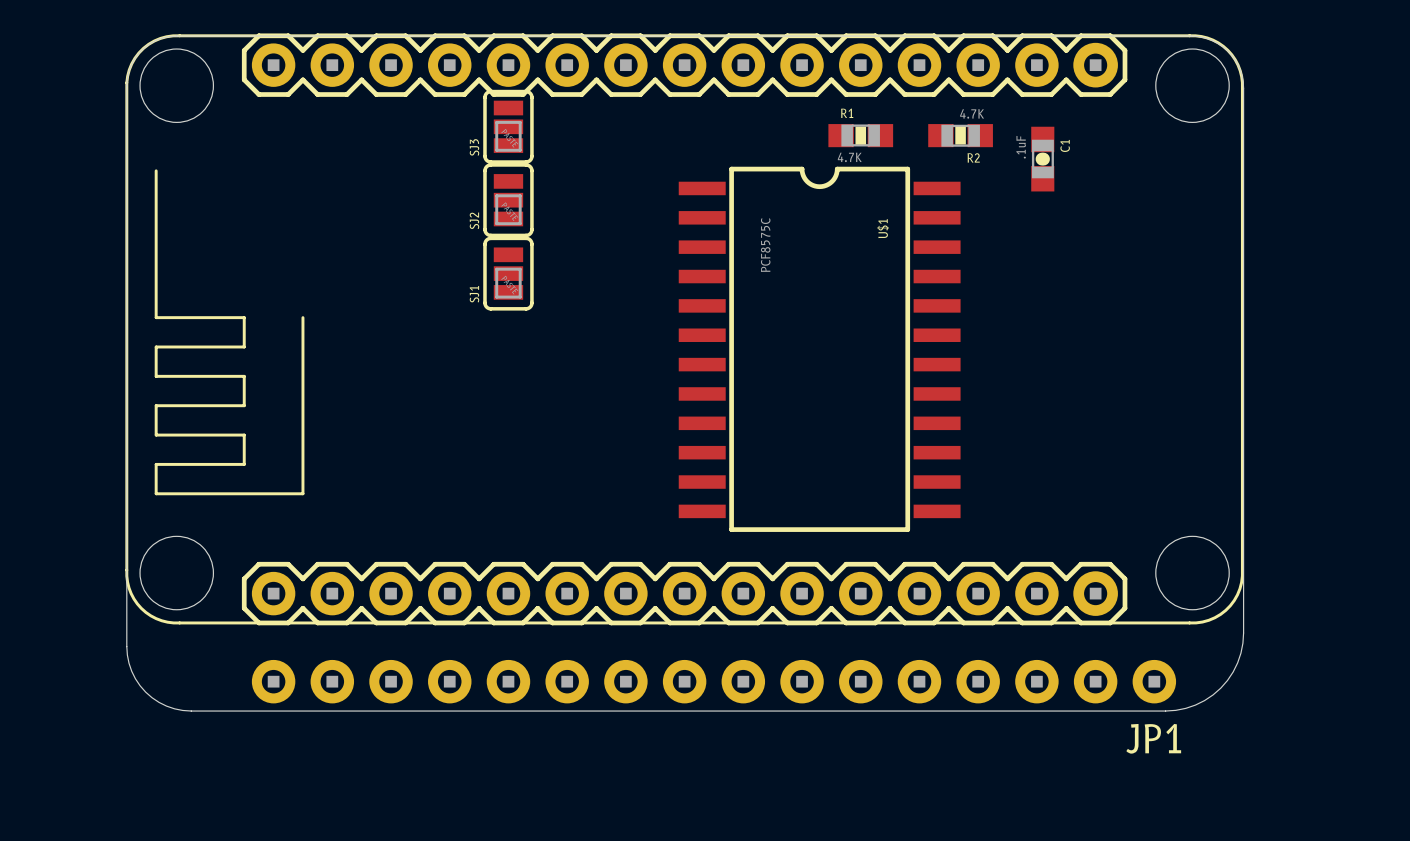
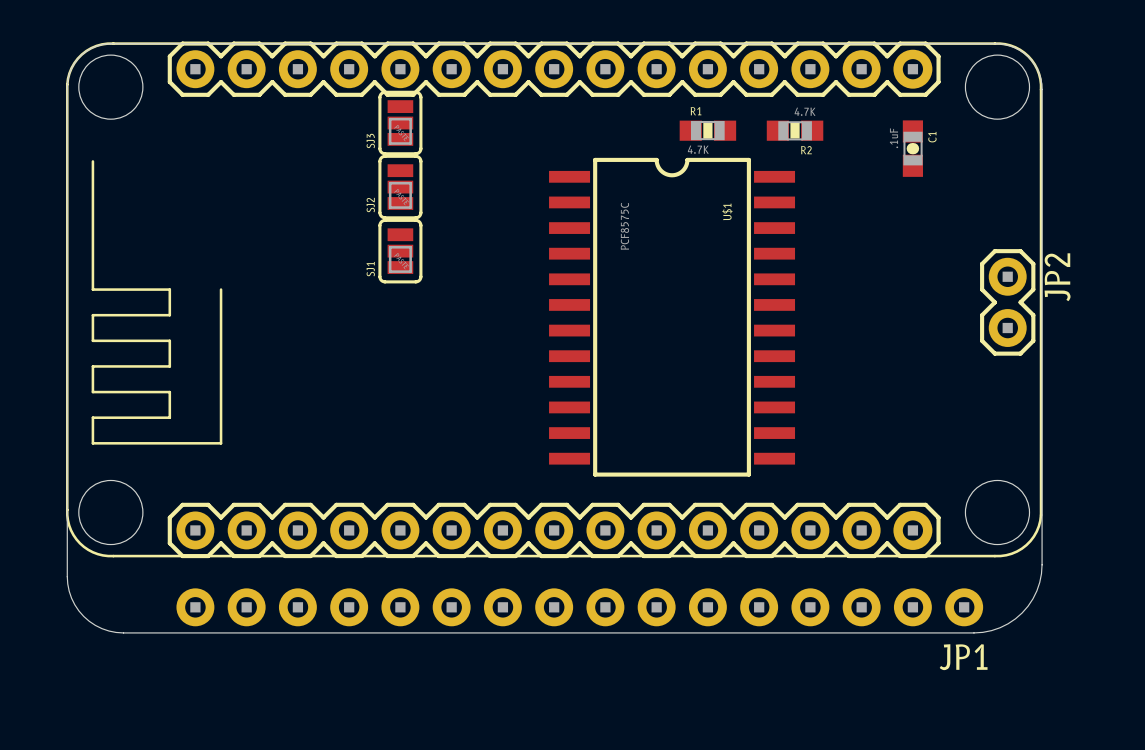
C1 position: (1042, 159) -> (912, 148)
JP2: none -> (1007, 302)

